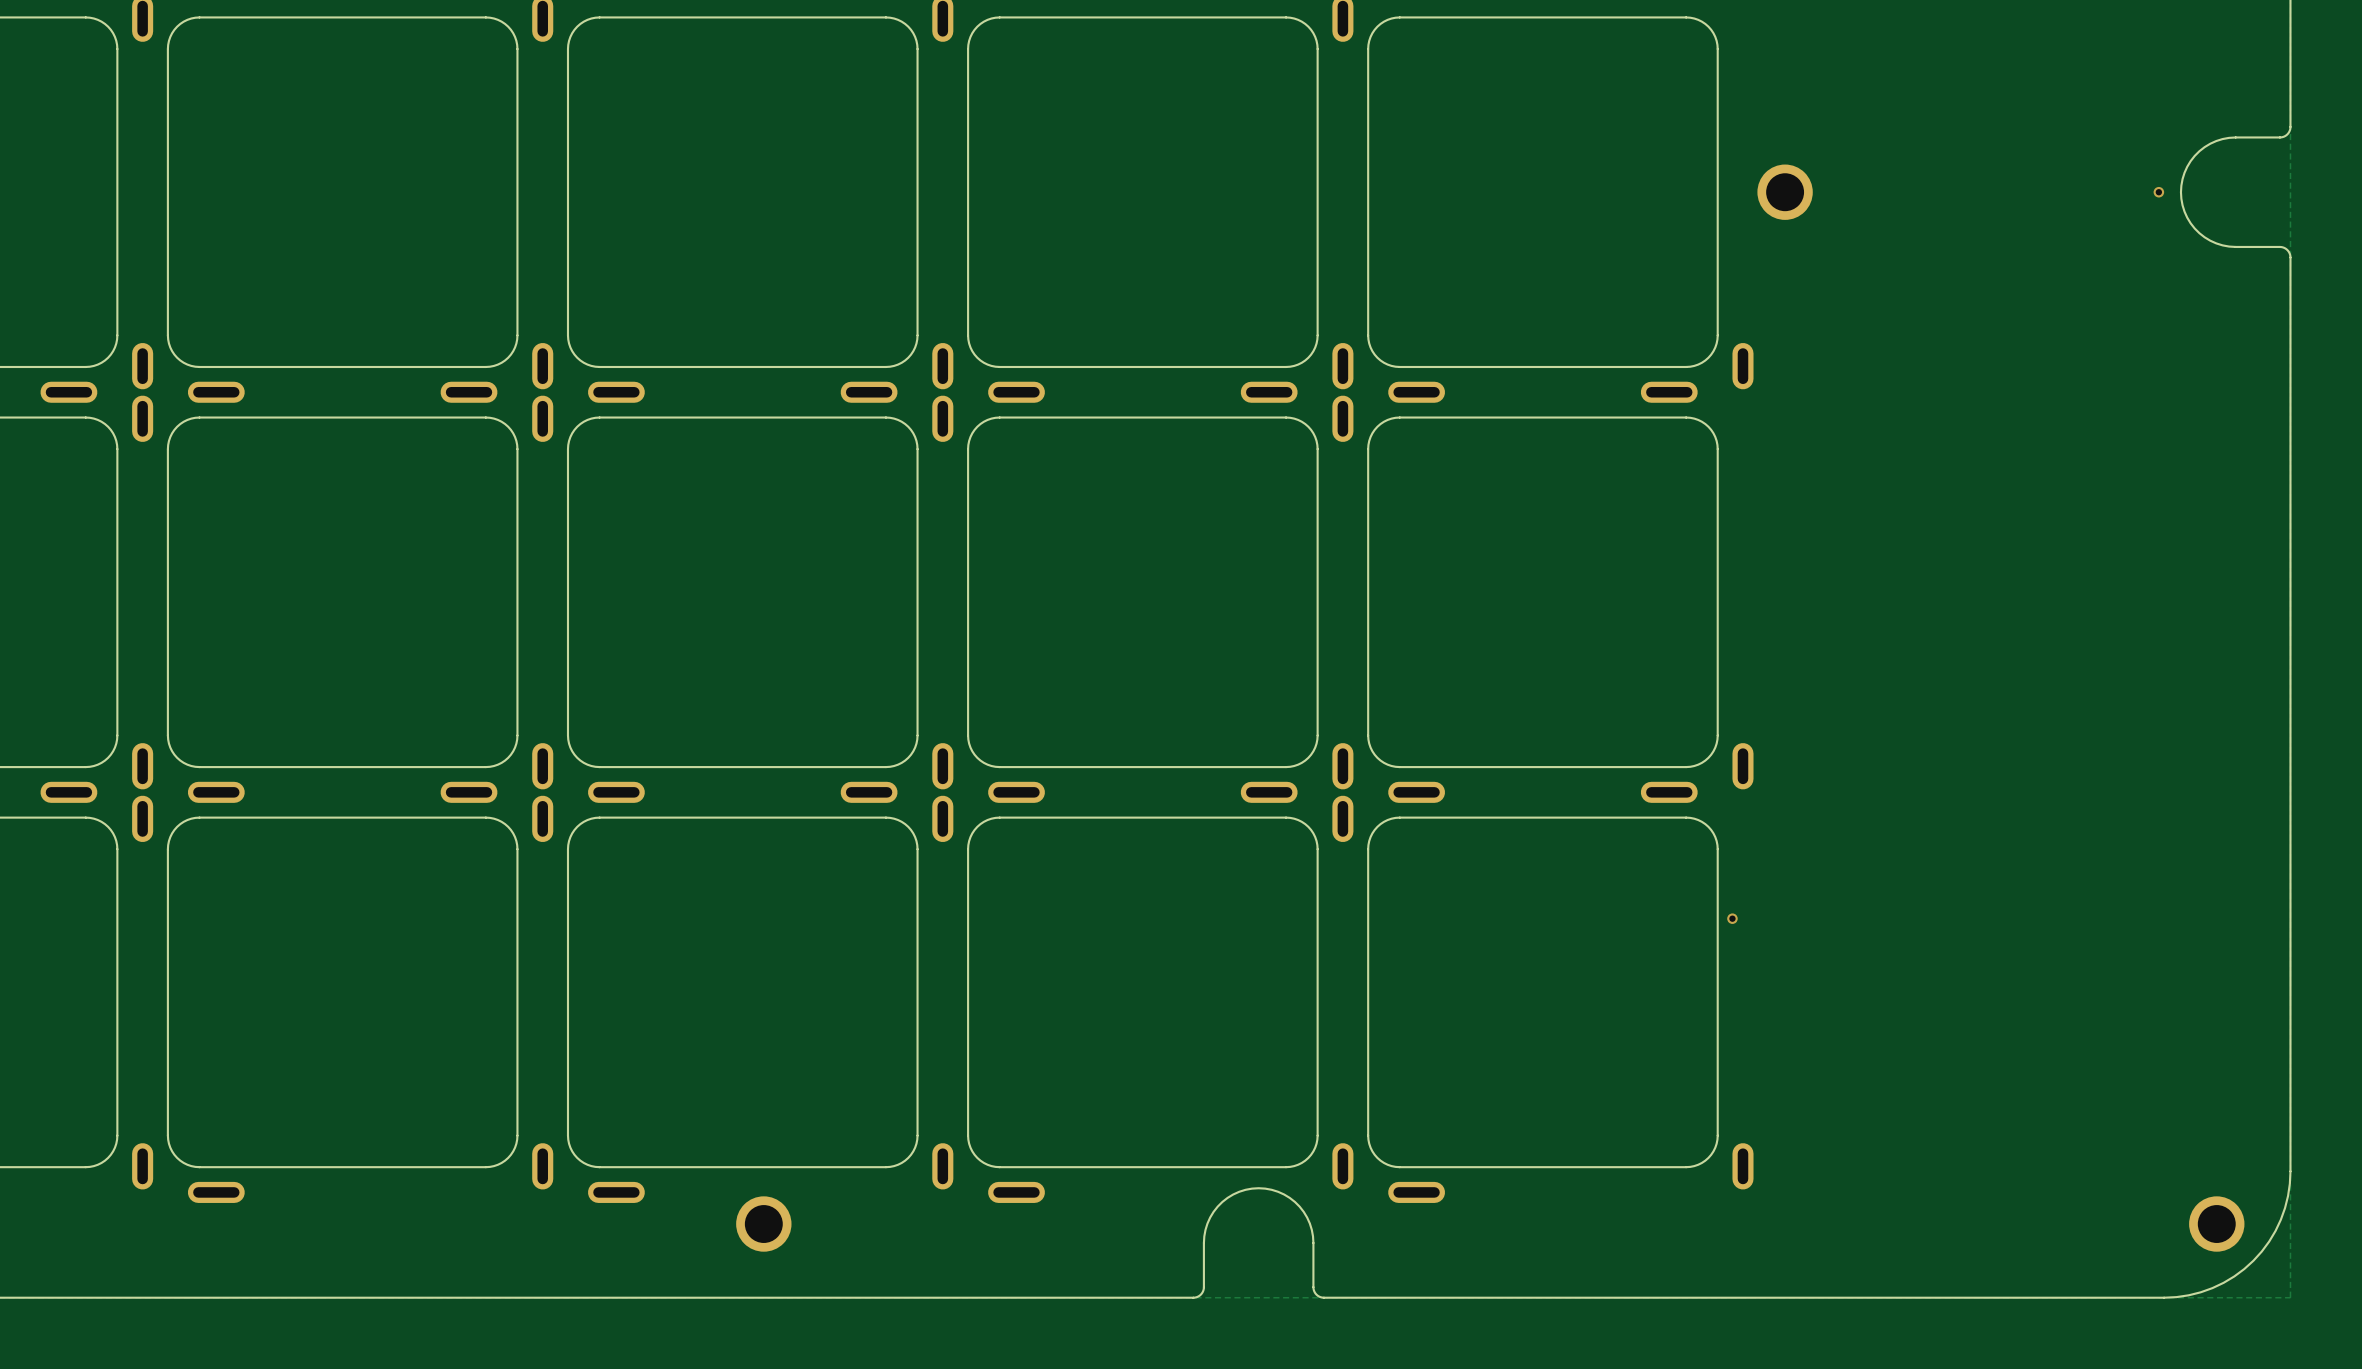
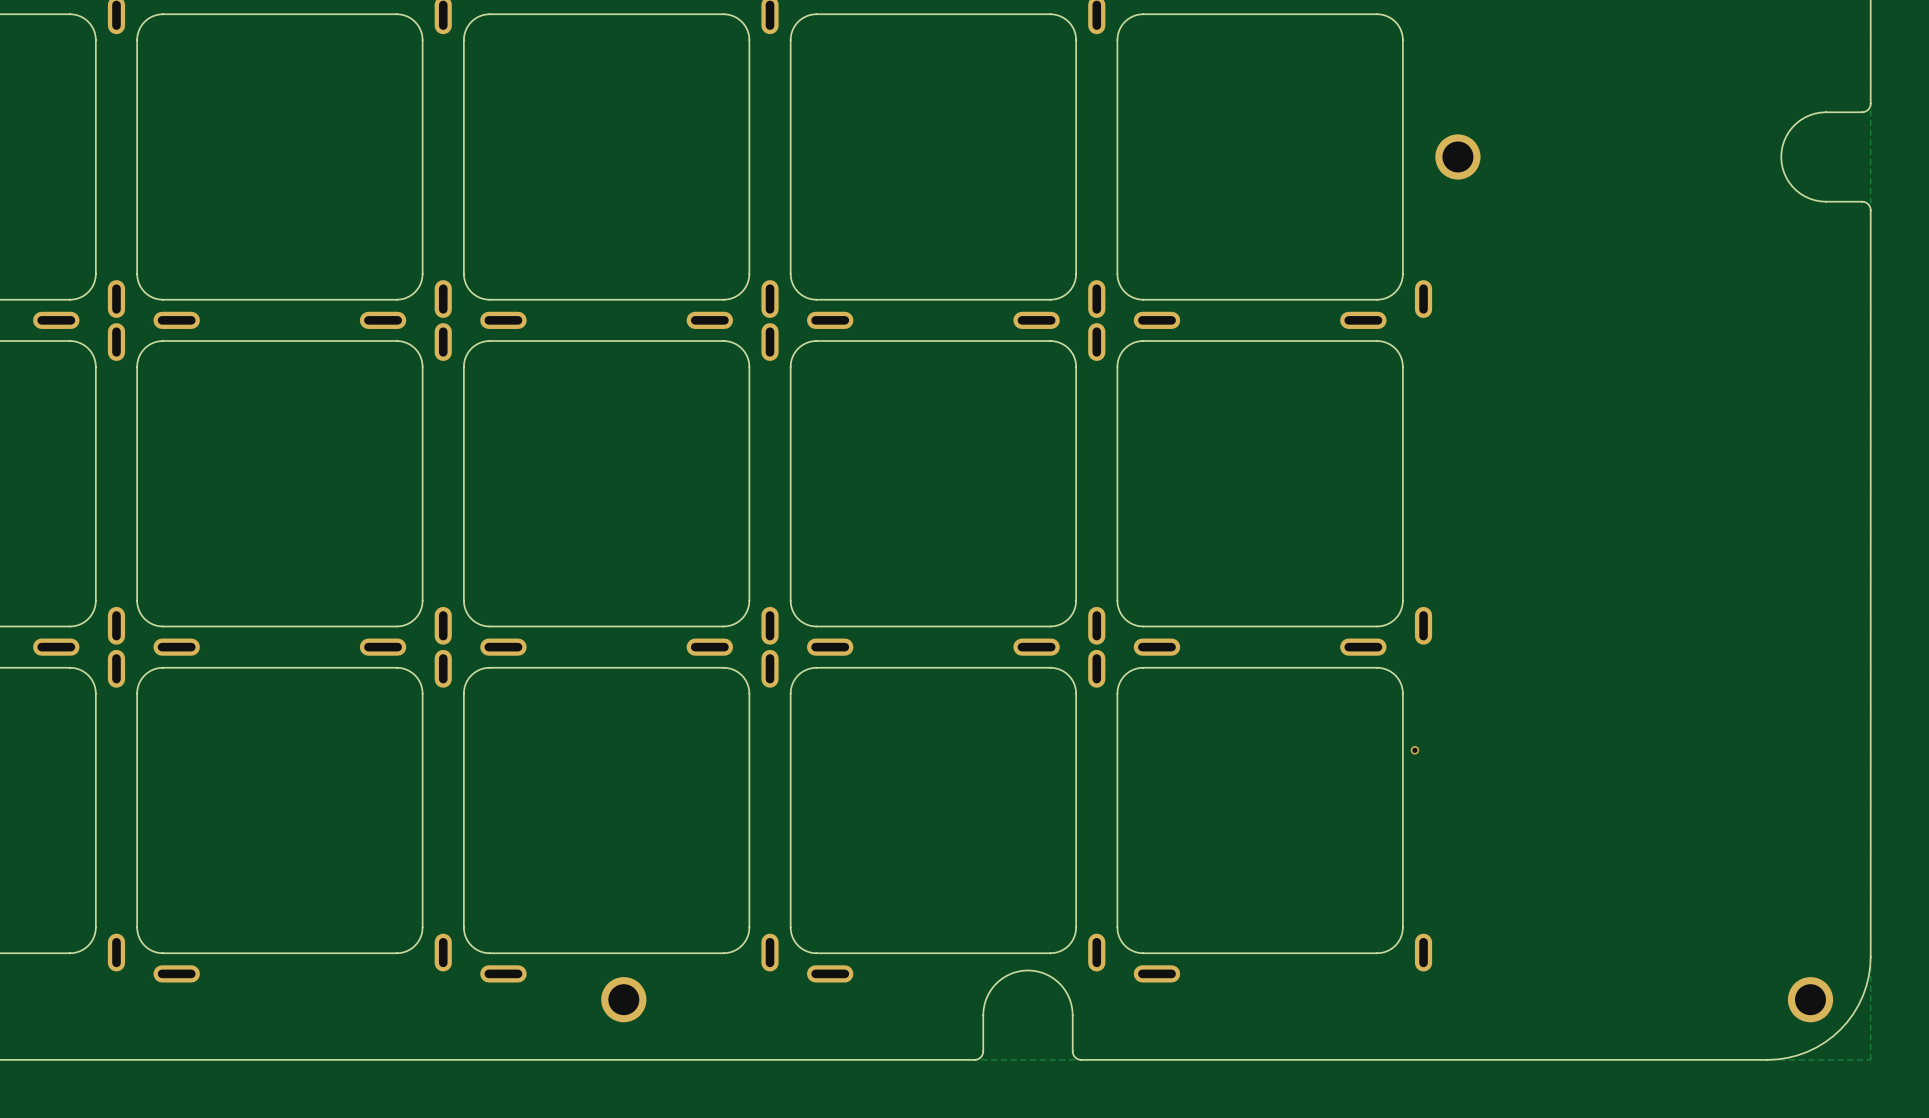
via: (2158, 192) -> none

